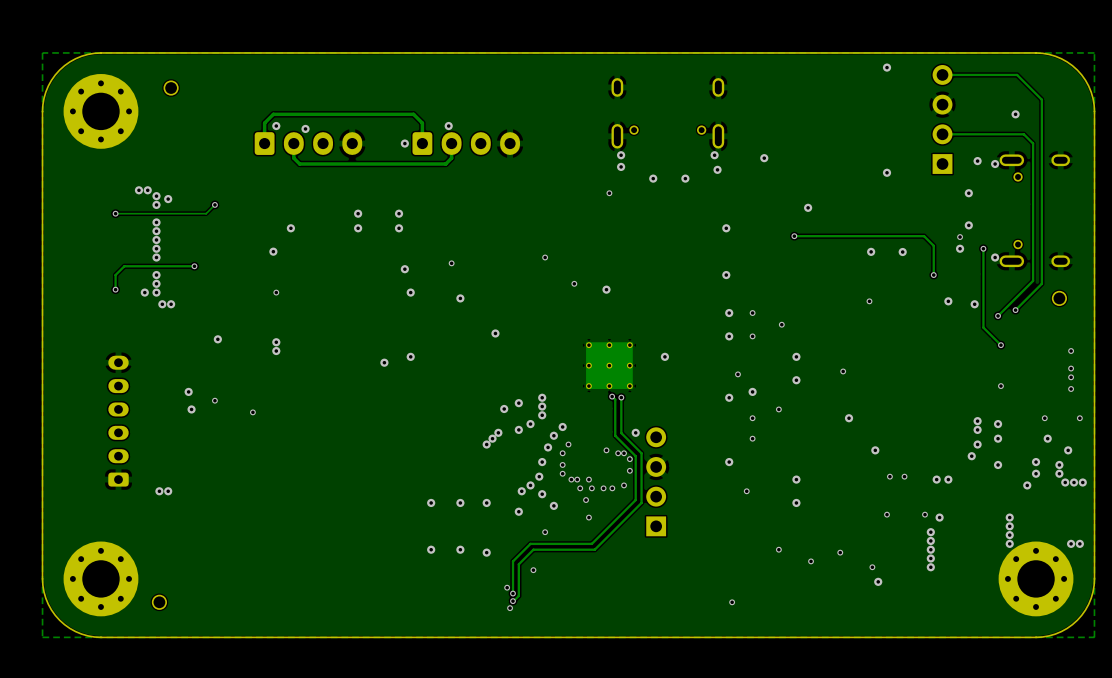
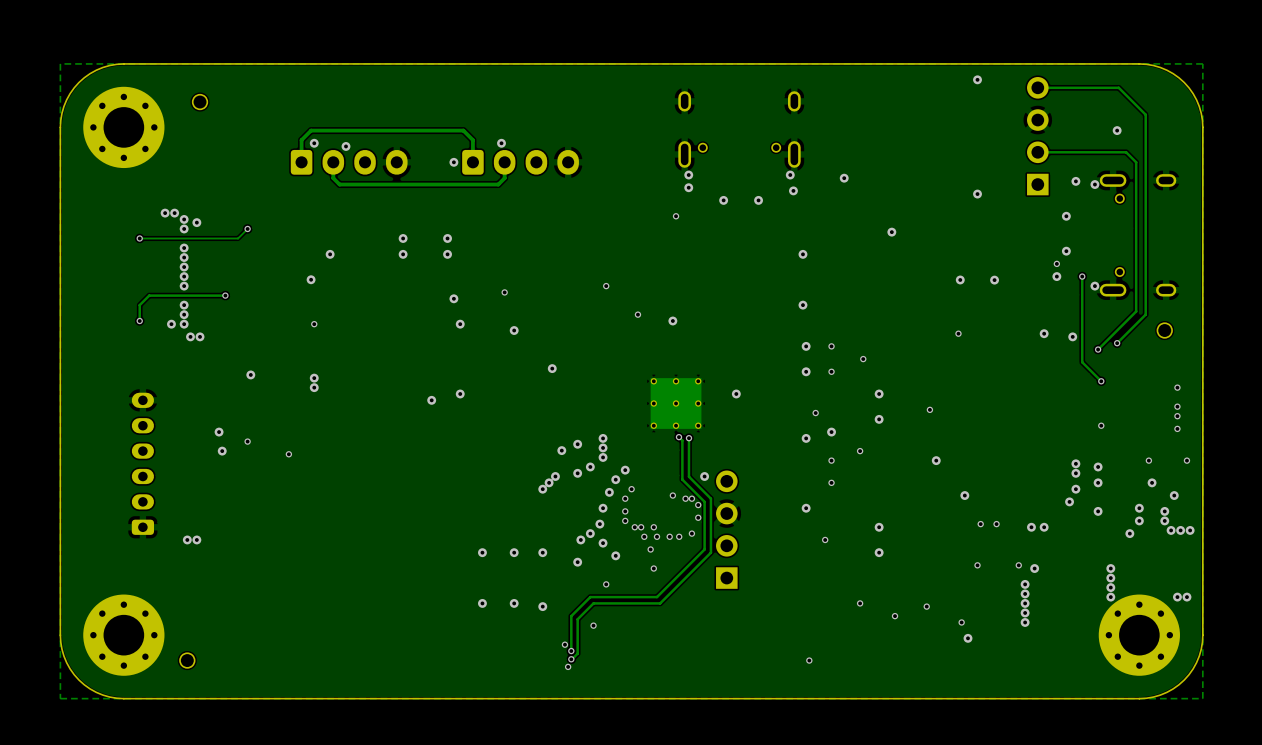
track: (794, 236) (924, 236) (933, 245) (933, 275) -> none
via: (794, 236) -> none
via: (933, 275) -> none

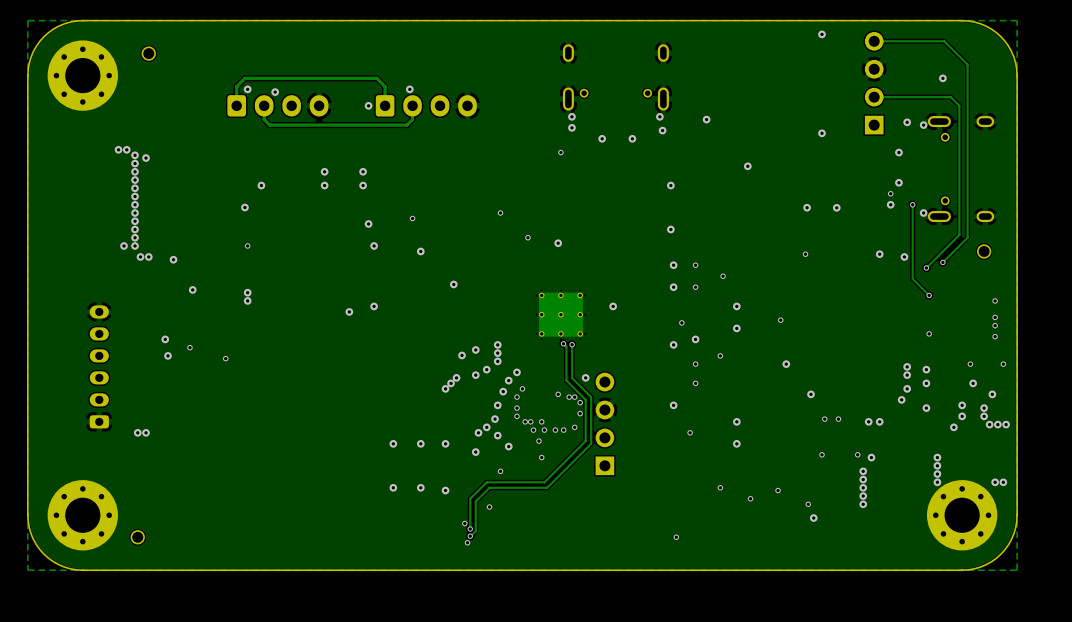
track: (247, 228) (238, 238) (139, 238) -> none
via: (247, 228) -> none
via: (139, 238) -> none
via: none -> (135, 171)
via: none -> (135, 221)
track: (225, 295) (149, 295) (139, 305) (139, 320) -> none
via: (225, 295) -> none
via: (139, 320) -> none
via: none -> (173, 259)

